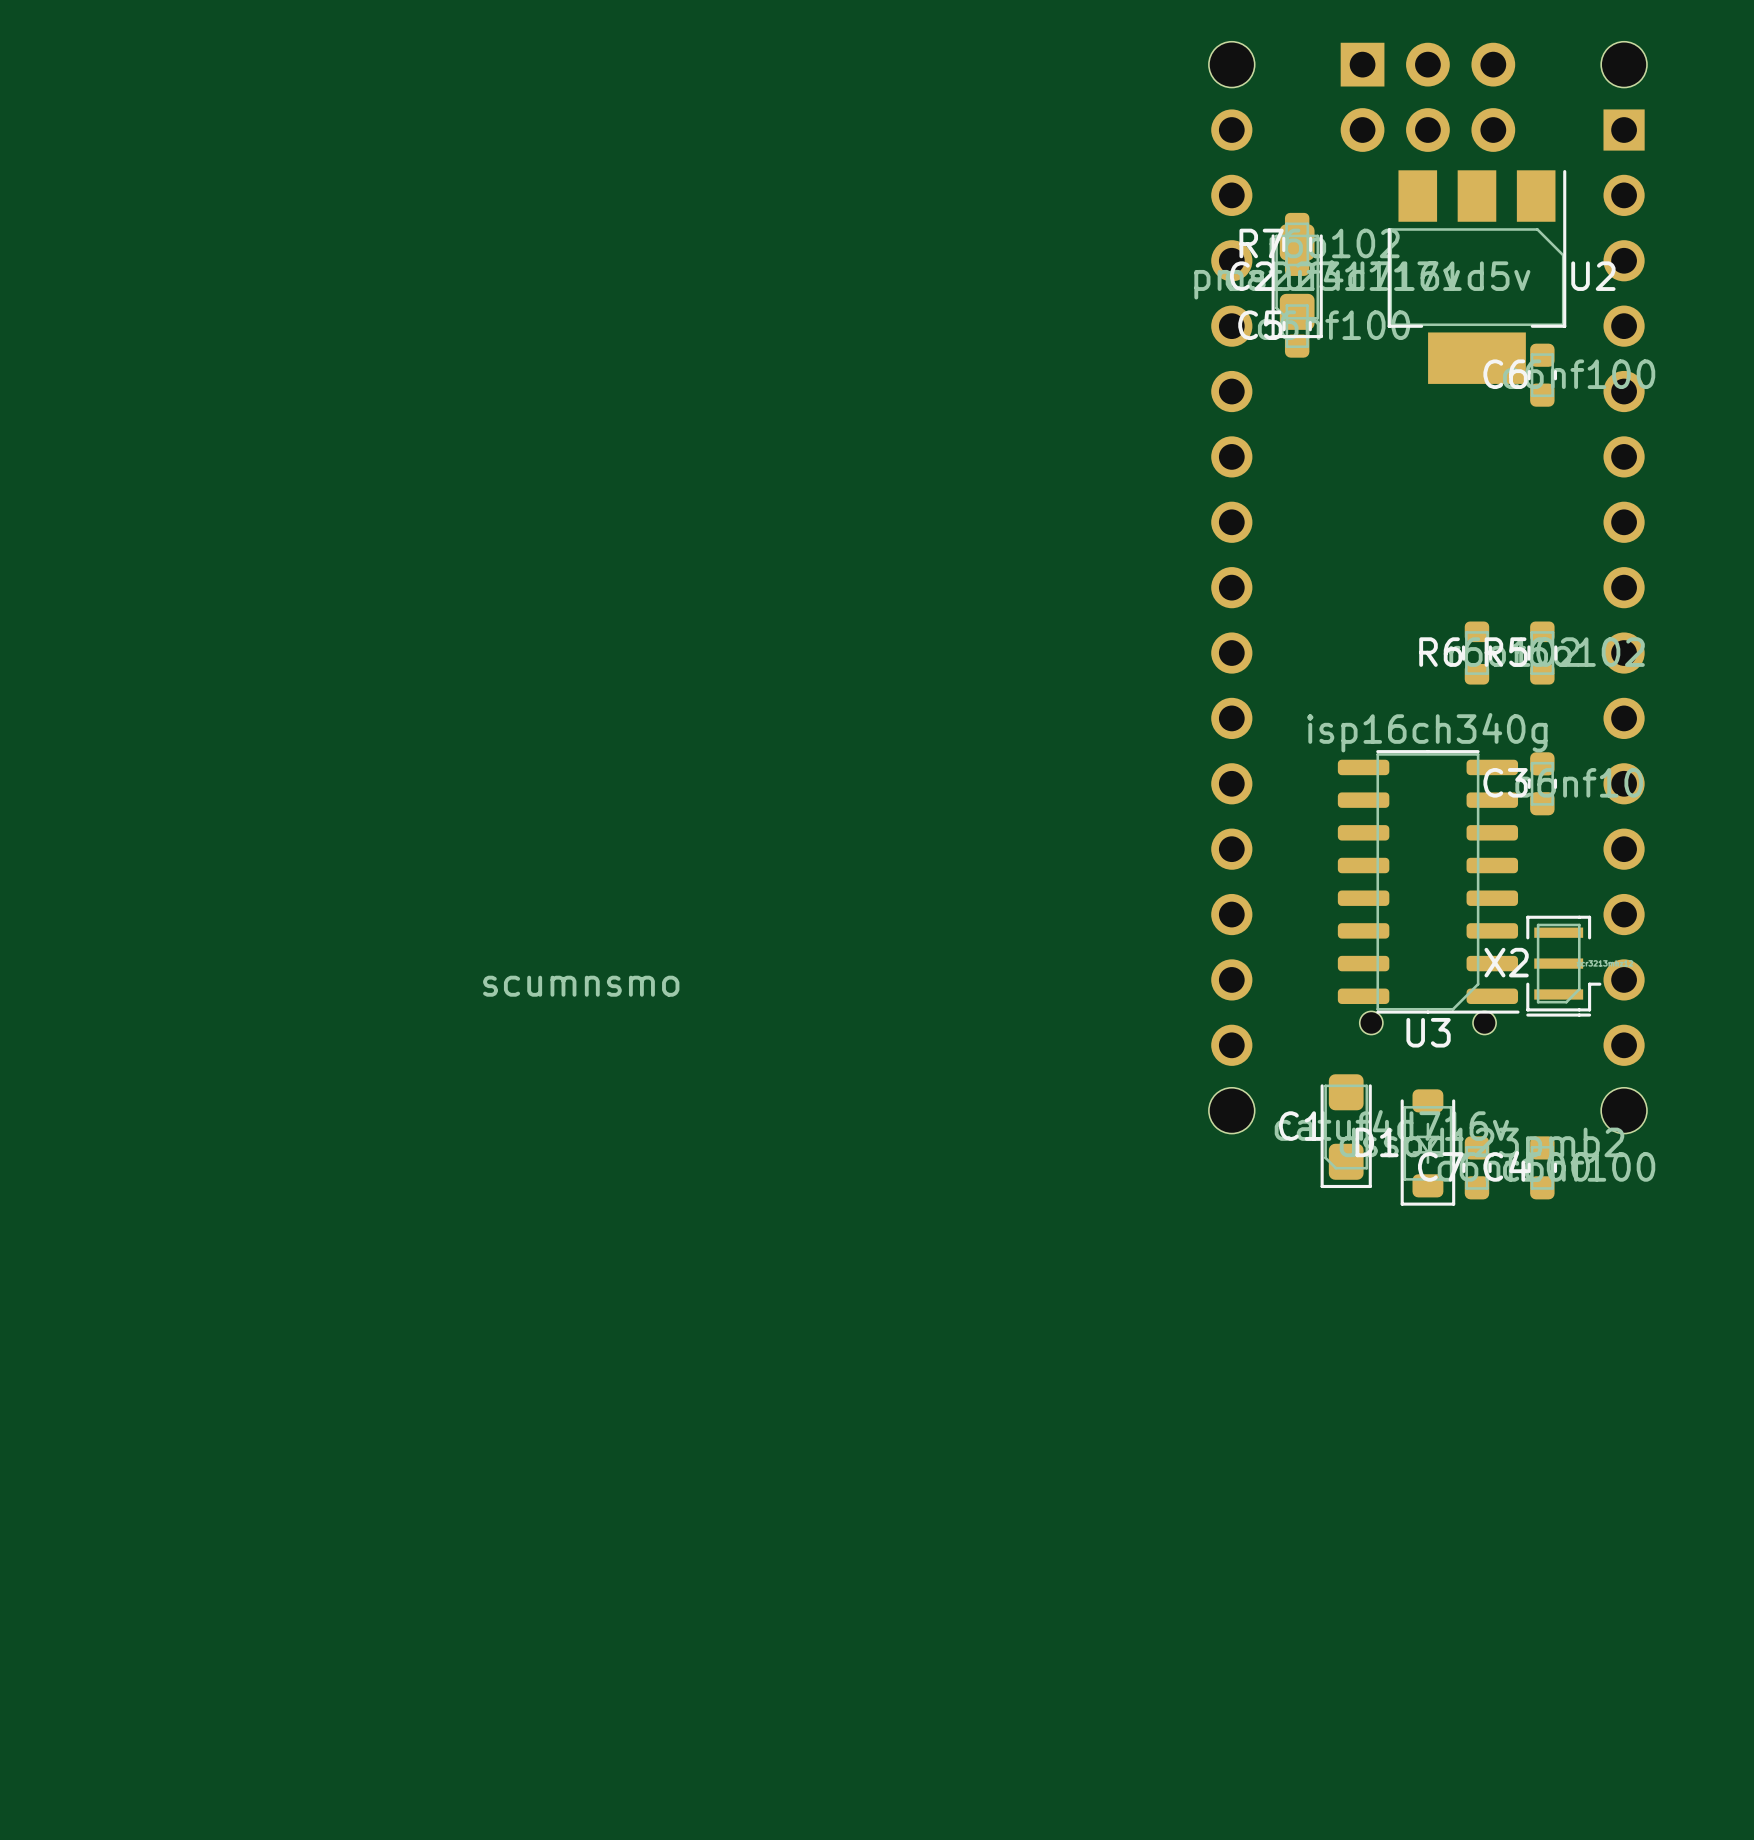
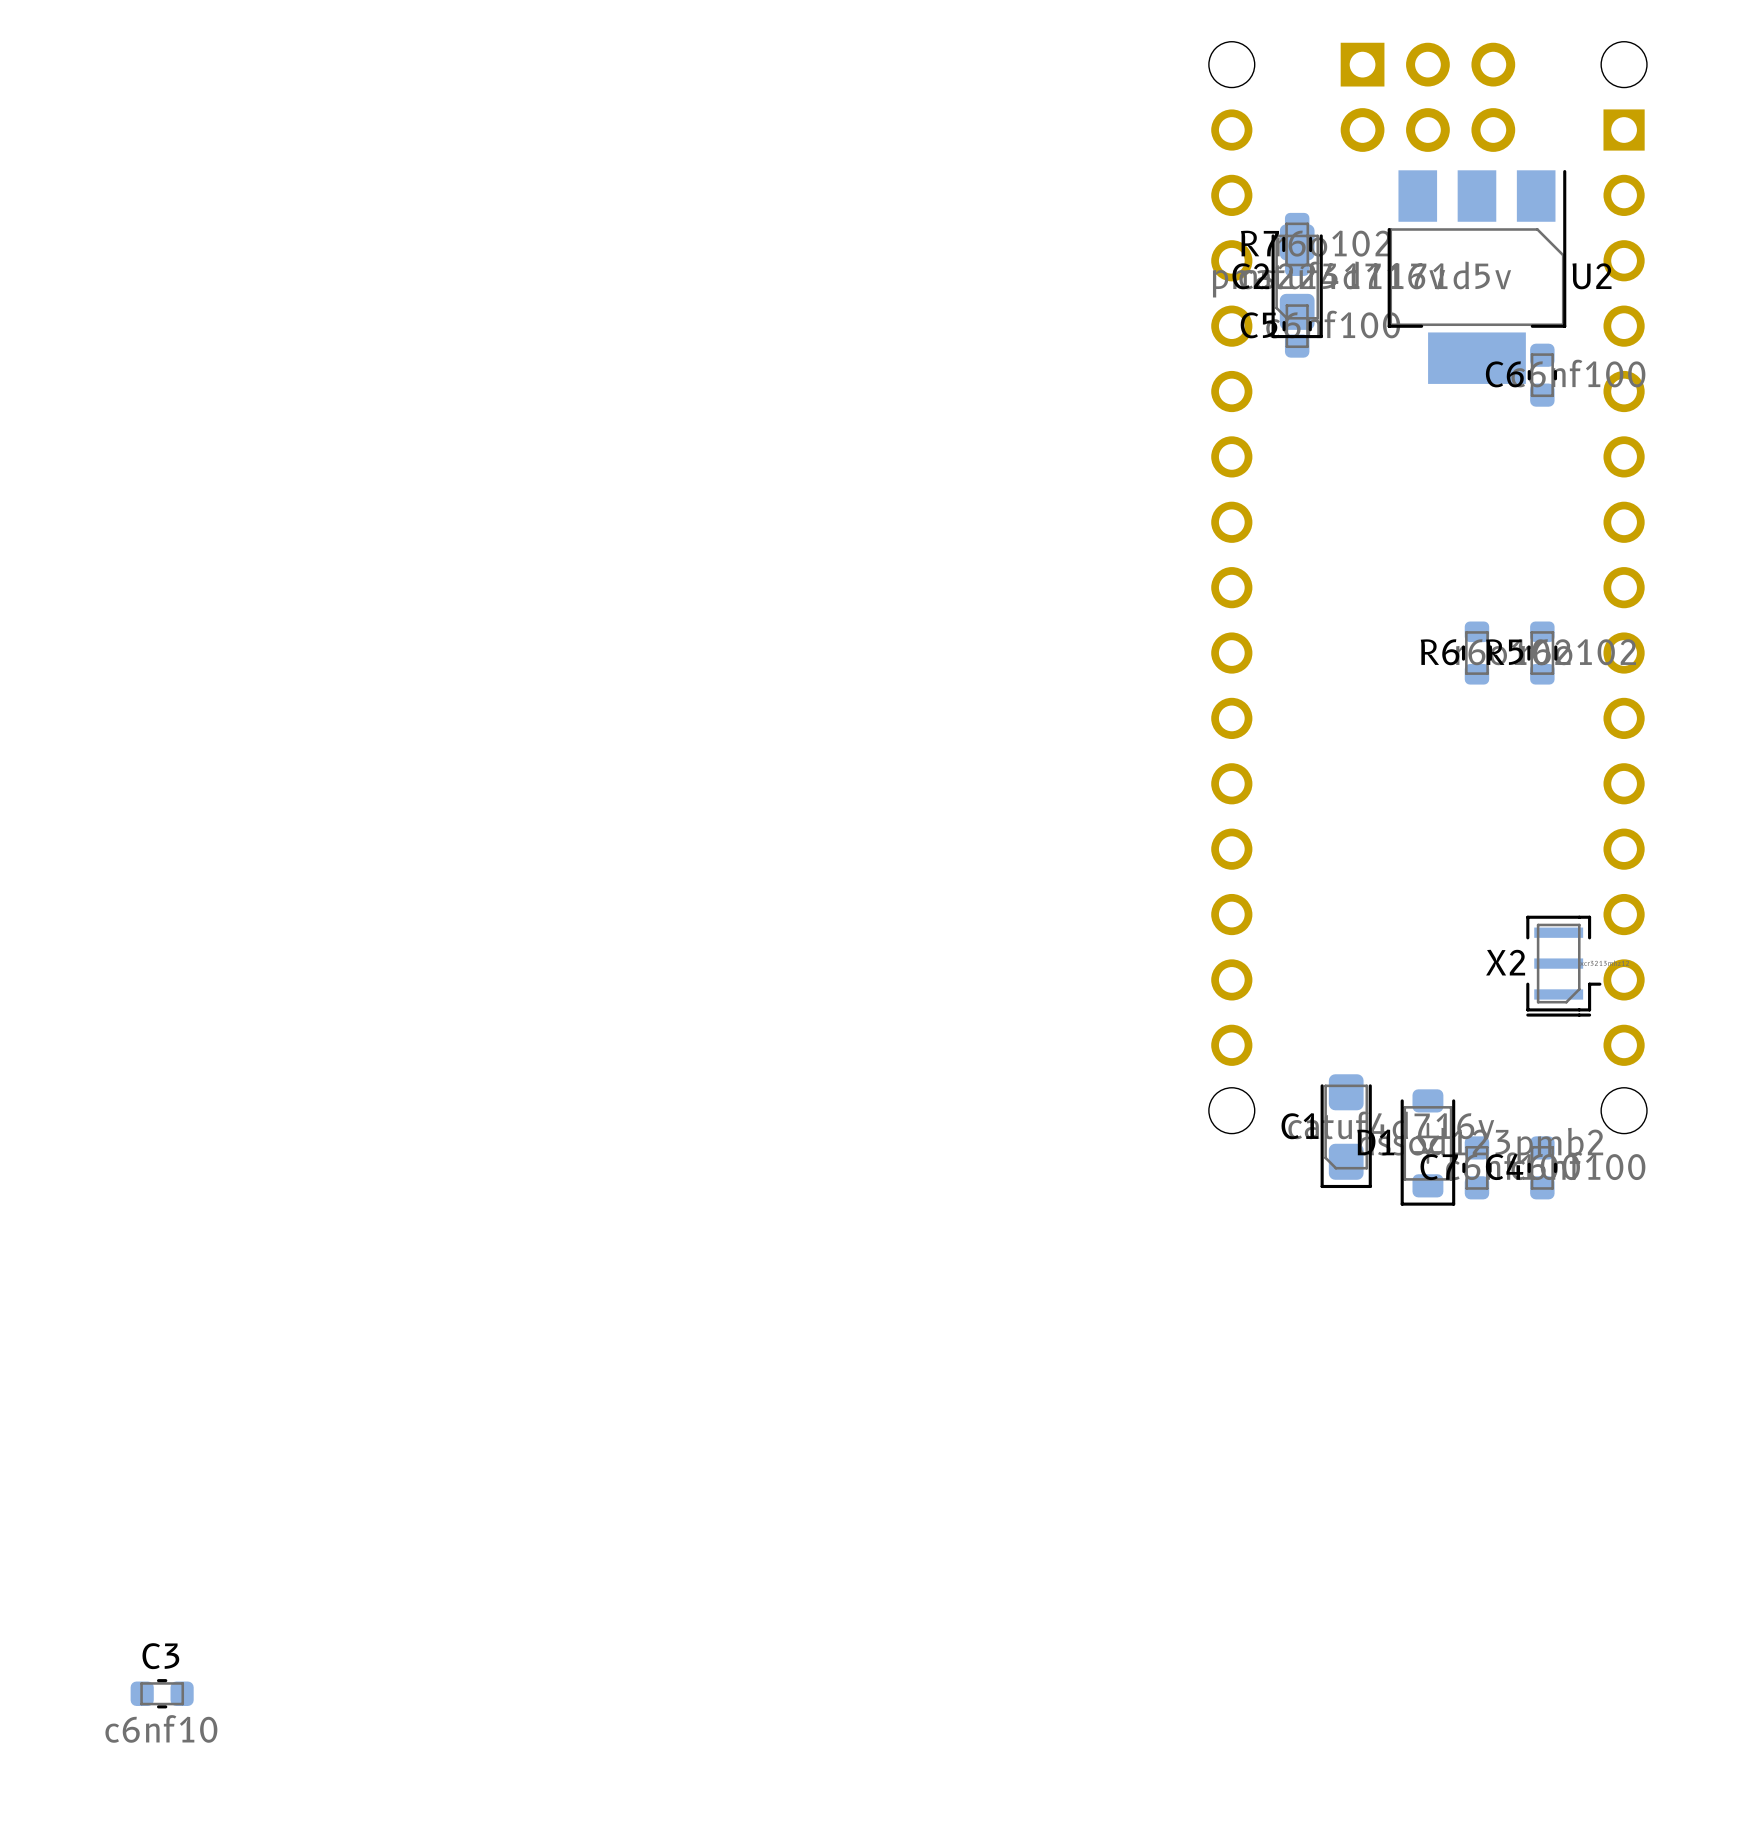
C3 rotation: 0° (1542, 783) -> 90° clockwise (162, 1693)
C3 position: (1542, 783) -> (162, 1693)
U3: isp16ch340g (1428, 881) -> none
part: scumnsmo (1427, 1022) -> none

